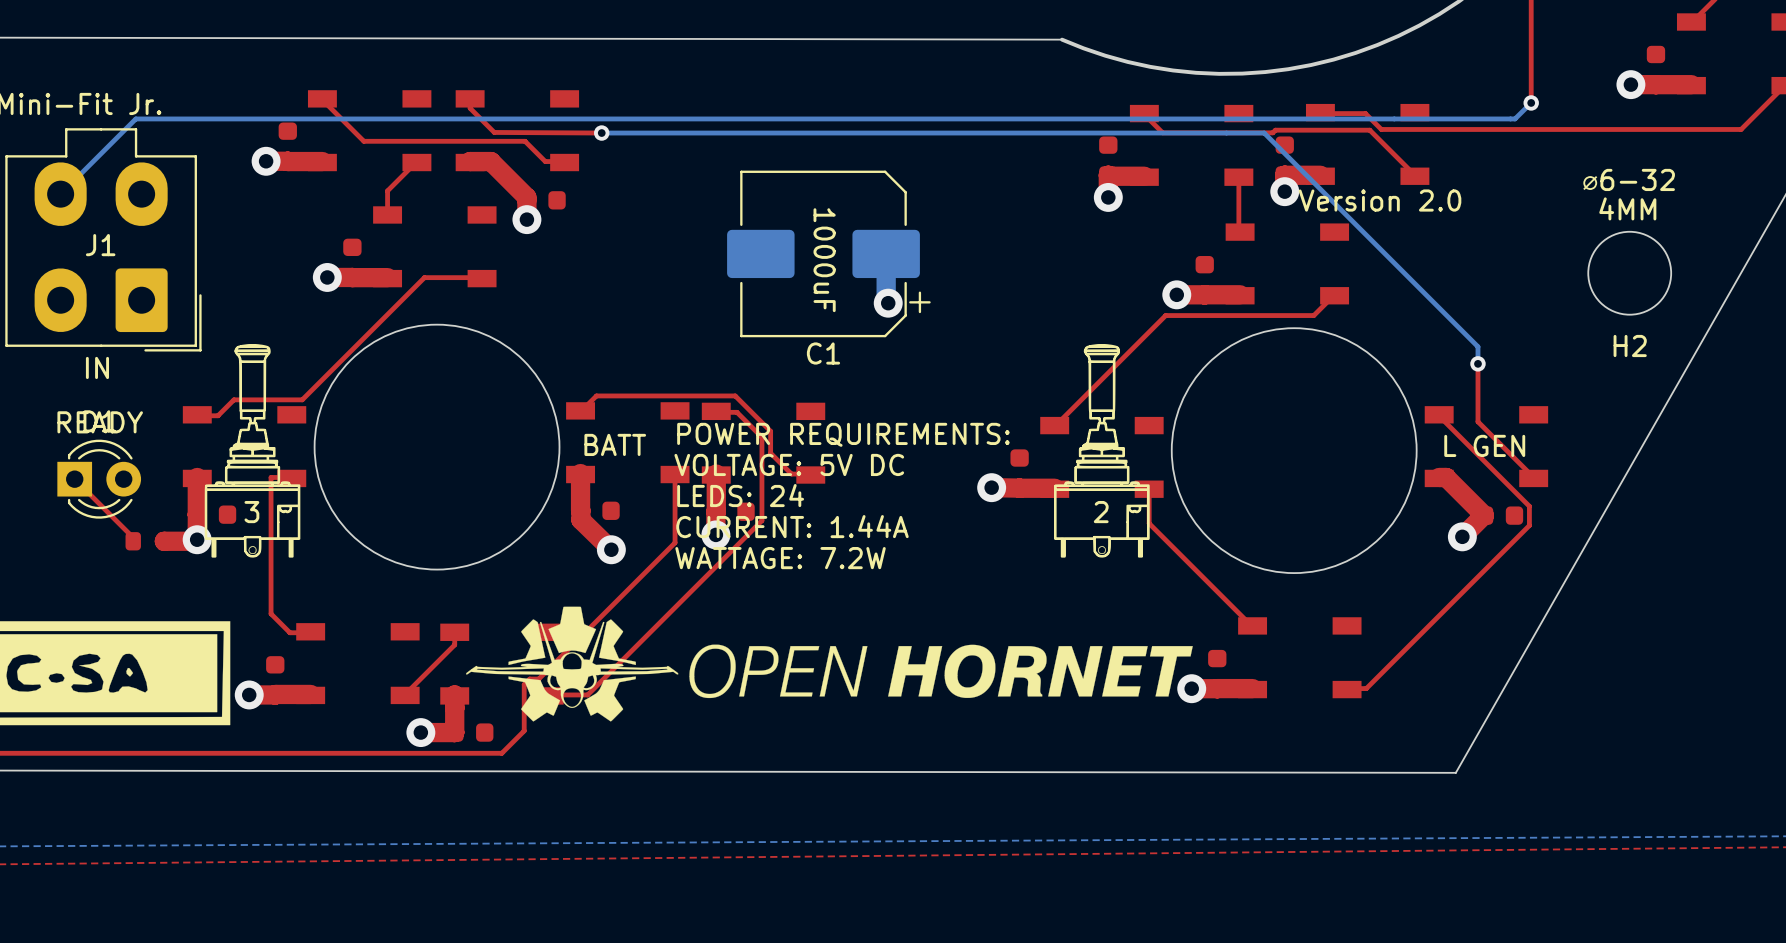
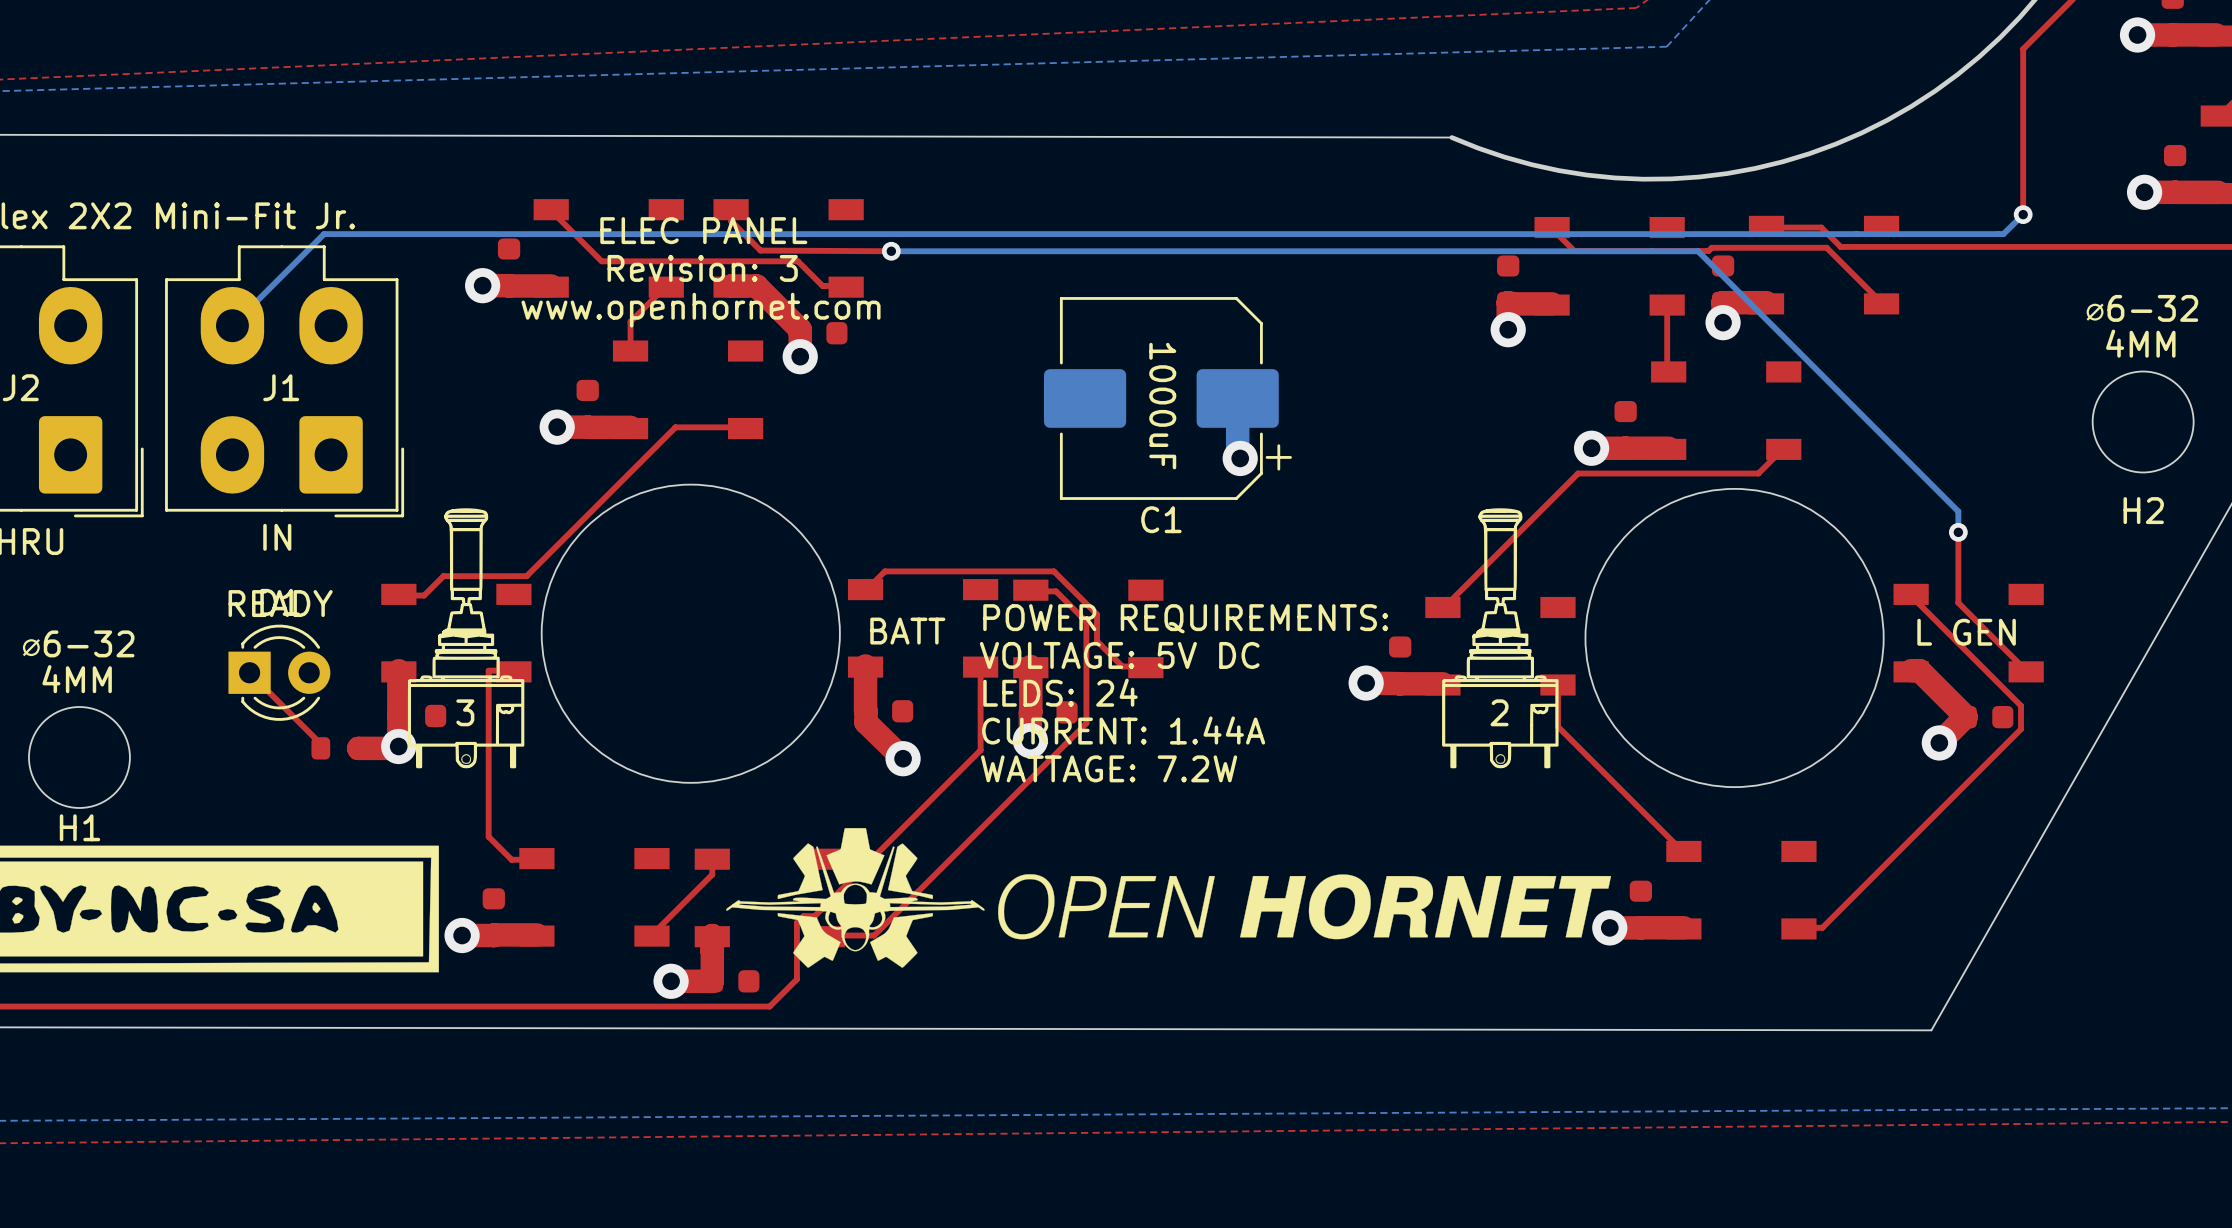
text: none -> ELEC PANEL (703, 230)
text: none -> Revision: 3 (702, 268)
text: none -> www.openhornet.com (701, 310)
text: Version 2.0 (1379, 200) -> none

